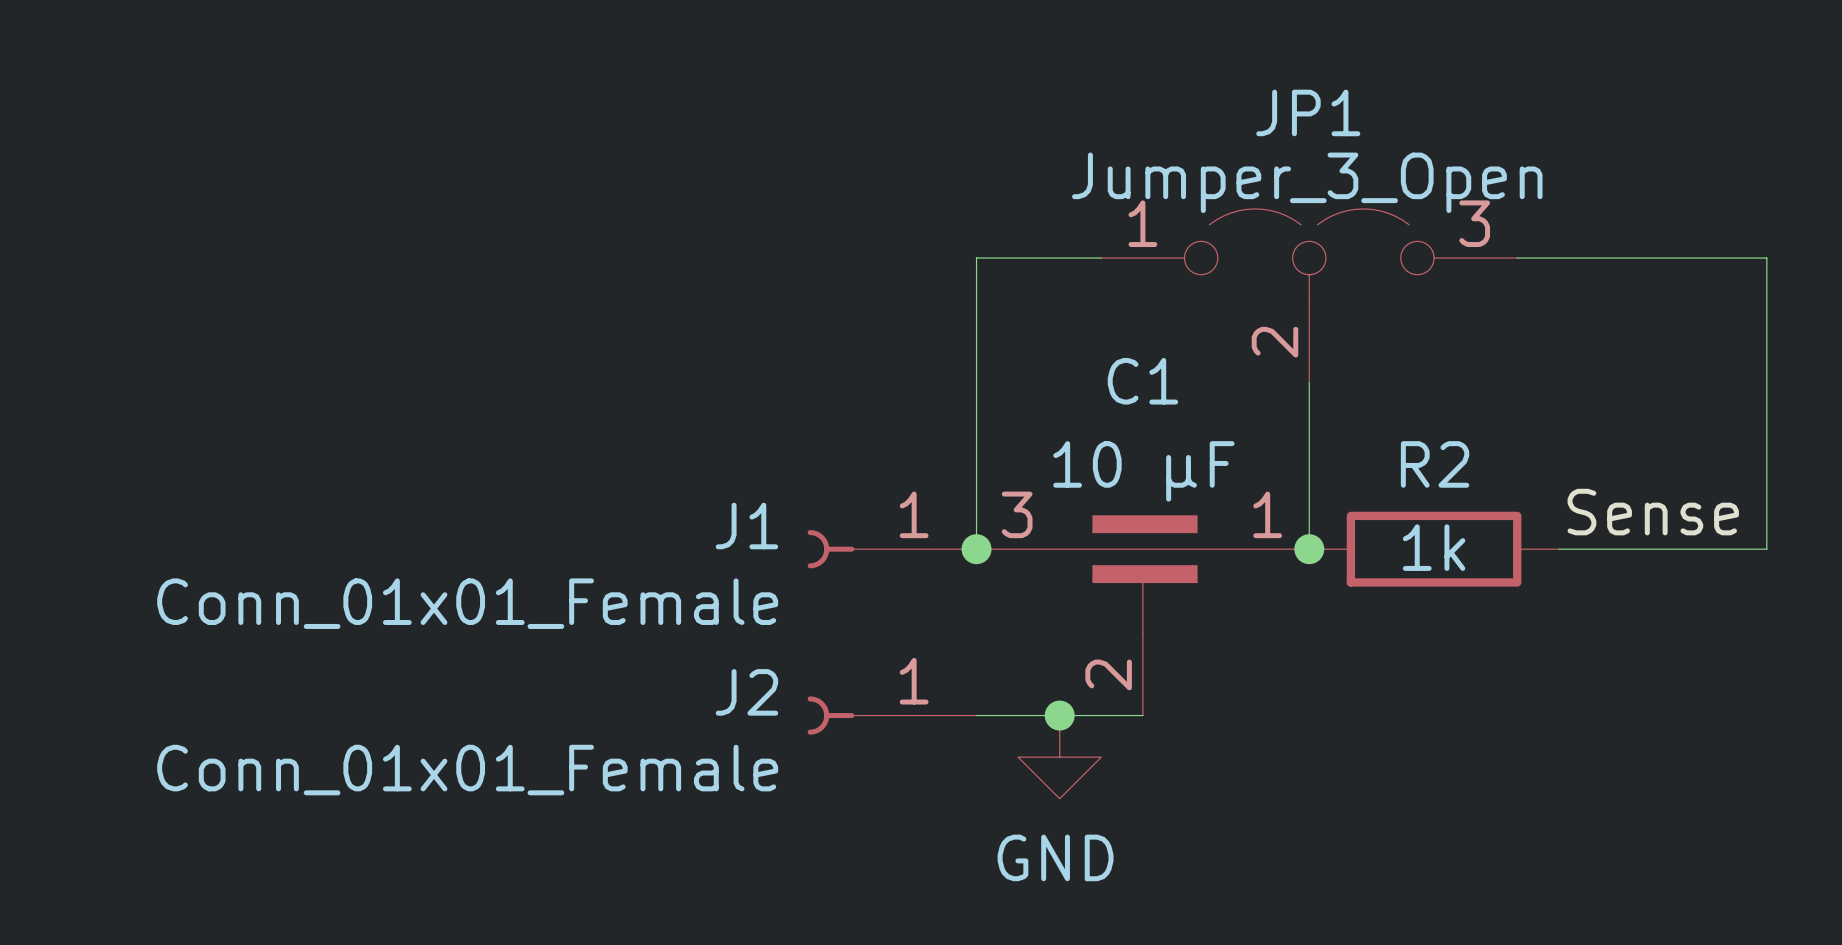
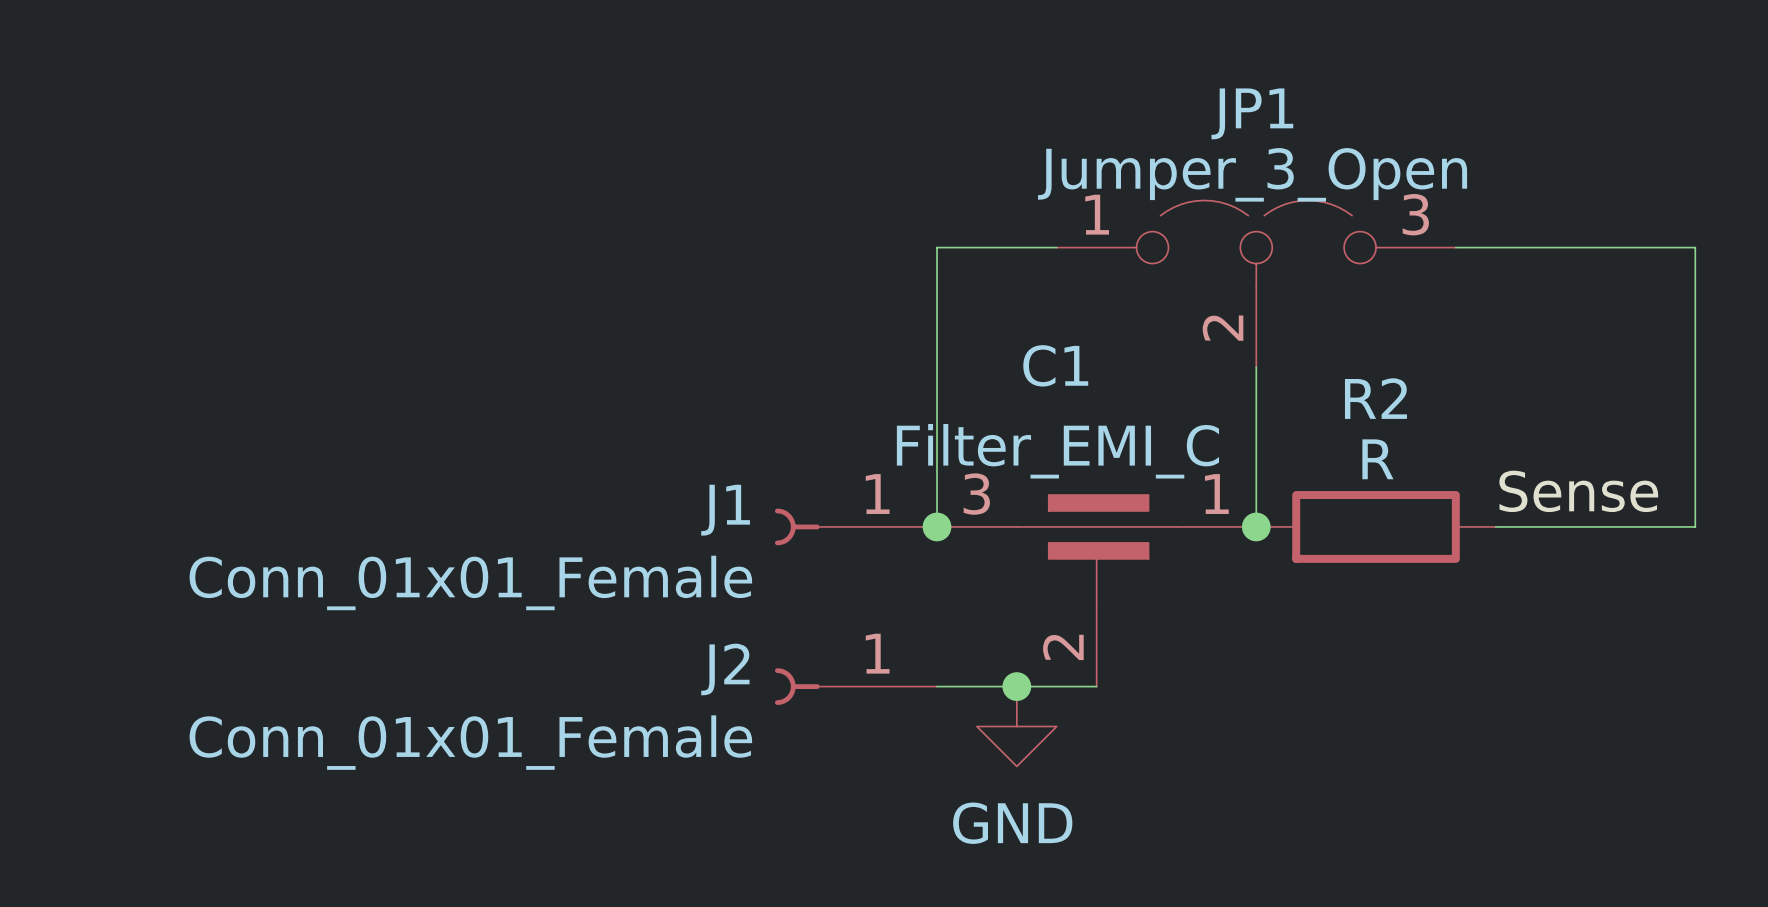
C1 name position: C1 (1142, 381) -> C1 (1055, 365)
R2 name position: R2 (1435, 464) -> R2 (1375, 398)
C1 value: 10 µF (1143, 471) -> Filter_EMI_C (1057, 451)
R2 value: 1k (1434, 547) -> R (1377, 459)

